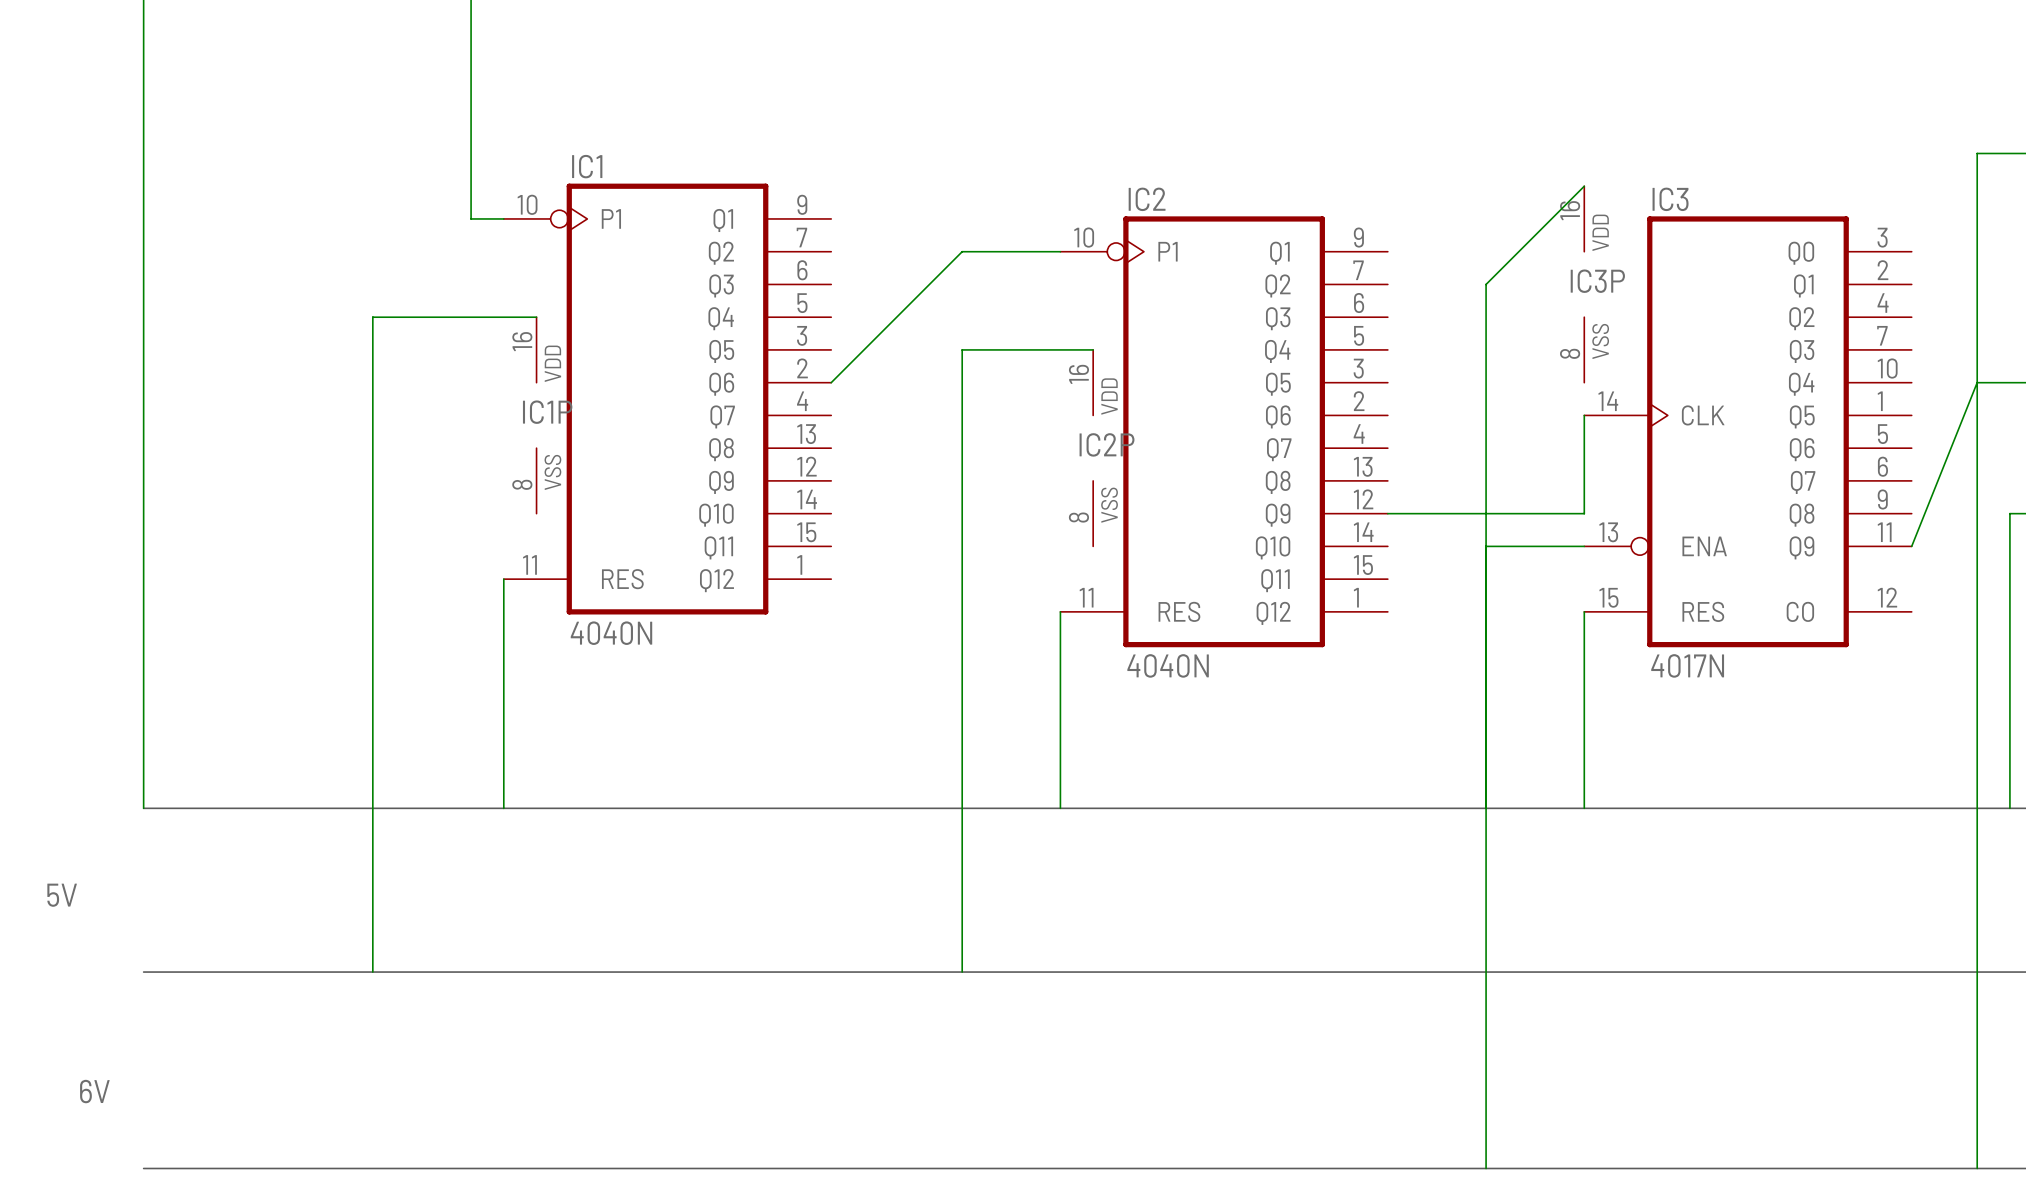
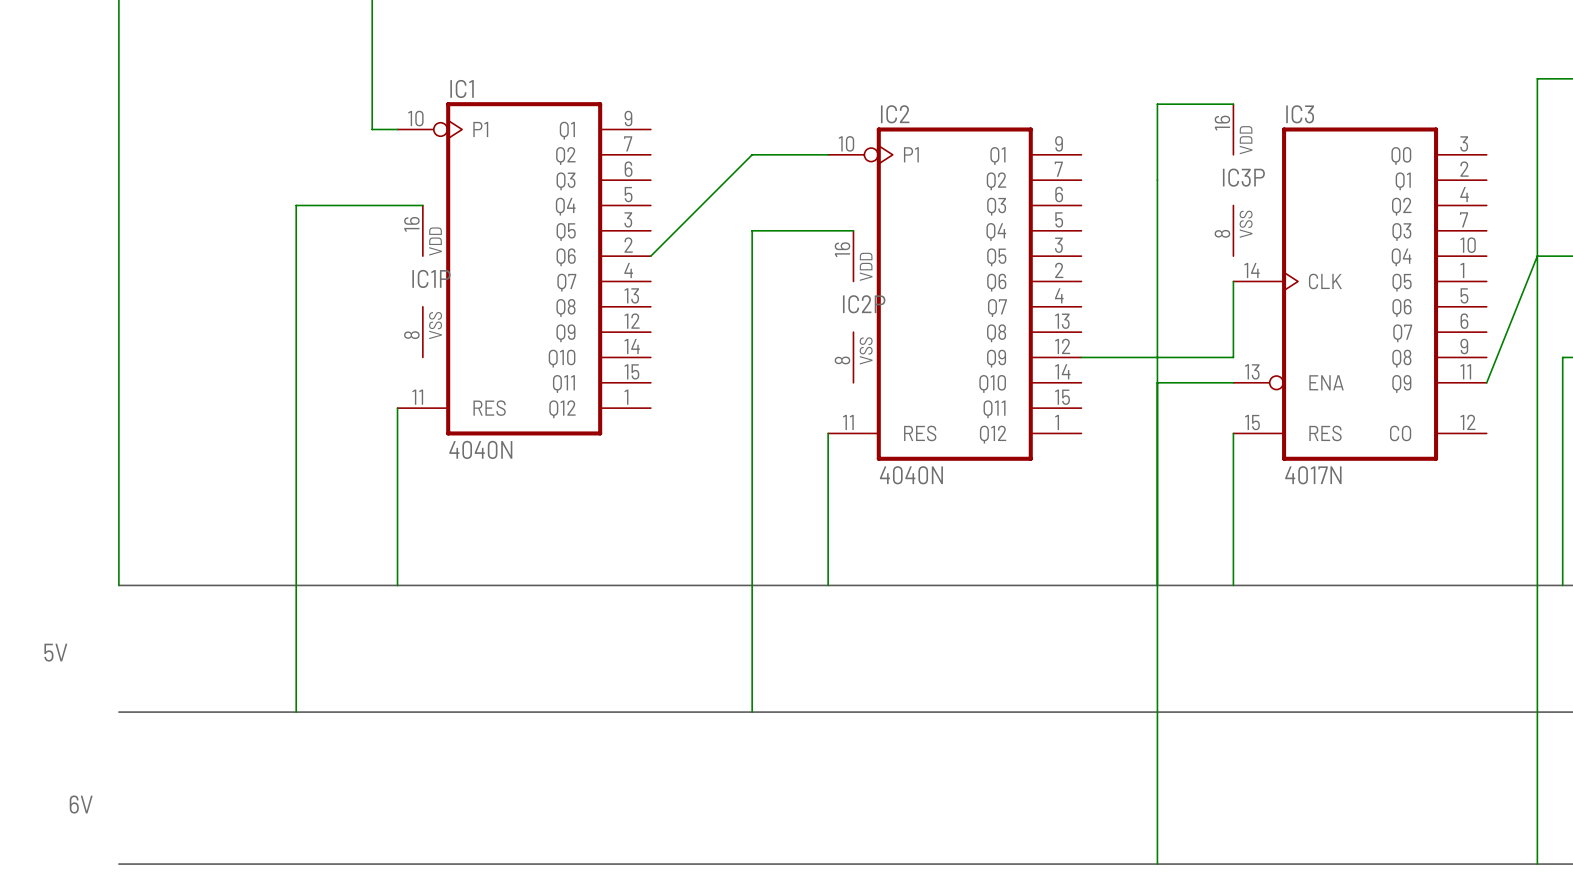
wire: (1584, 186) (1486, 284) -> (1233, 104) (1157, 104) (1157, 180)

